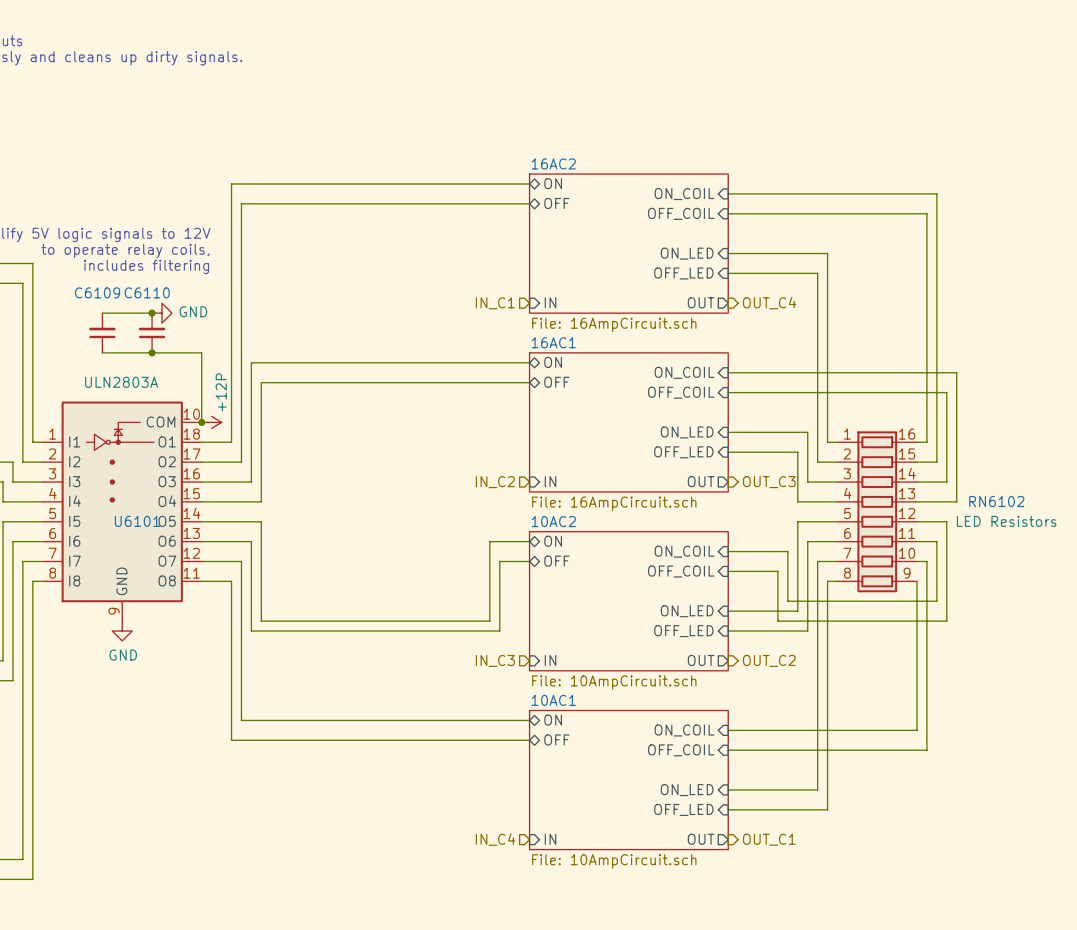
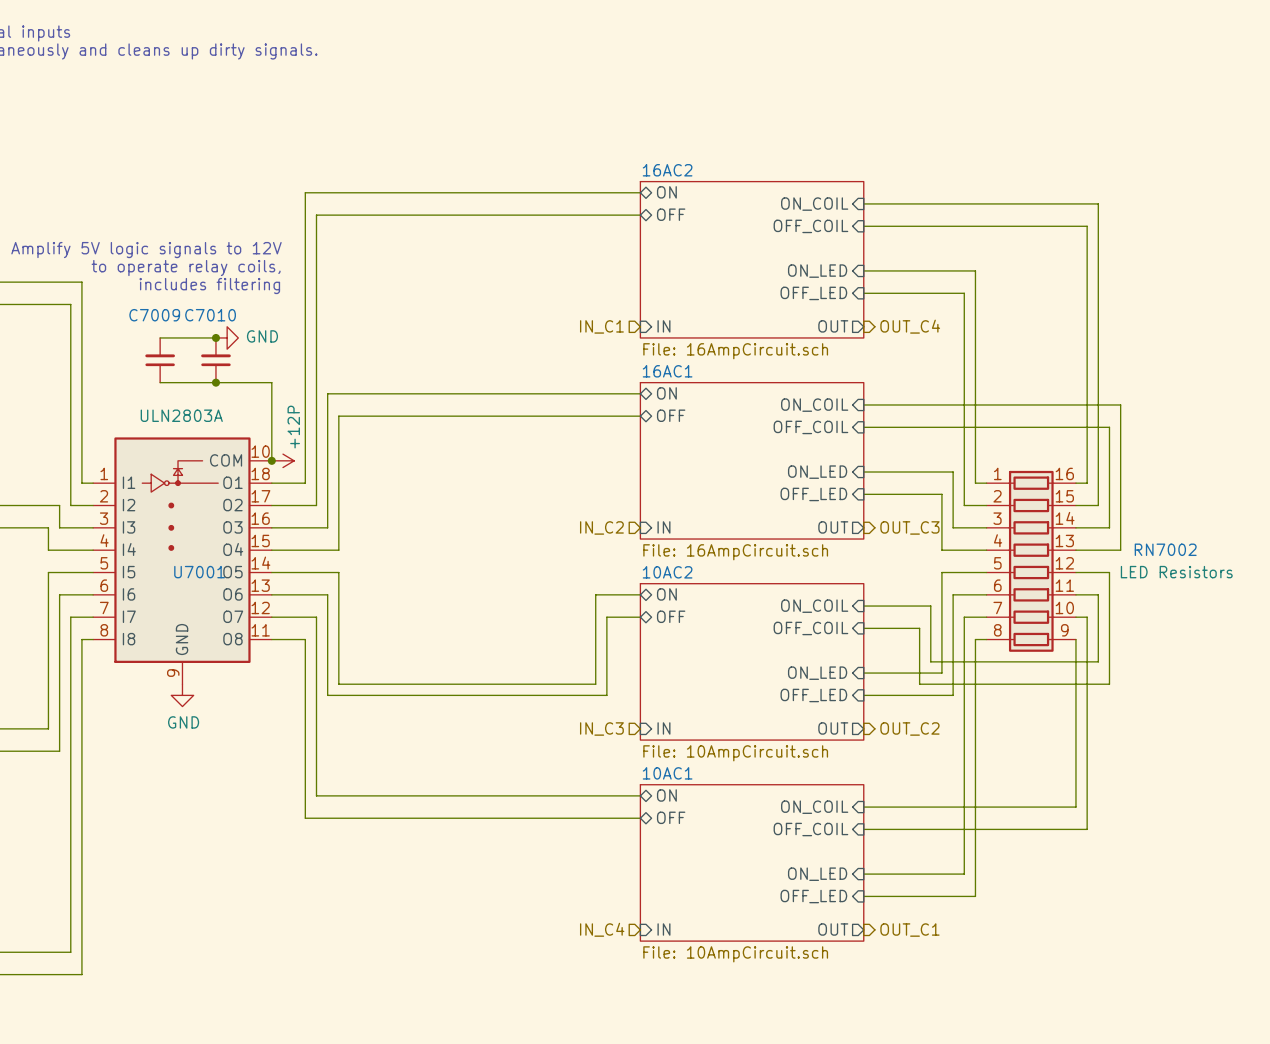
C6109 name: C6109 (97, 292) -> C7009 (154, 315)
C6110 name: C6110 (147, 292) -> C7010 (210, 315)
RN6102 name: RN6102 (996, 501) -> RN7002 (1165, 549)
U6101 name: U6101 (137, 521) -> U7001 (199, 572)

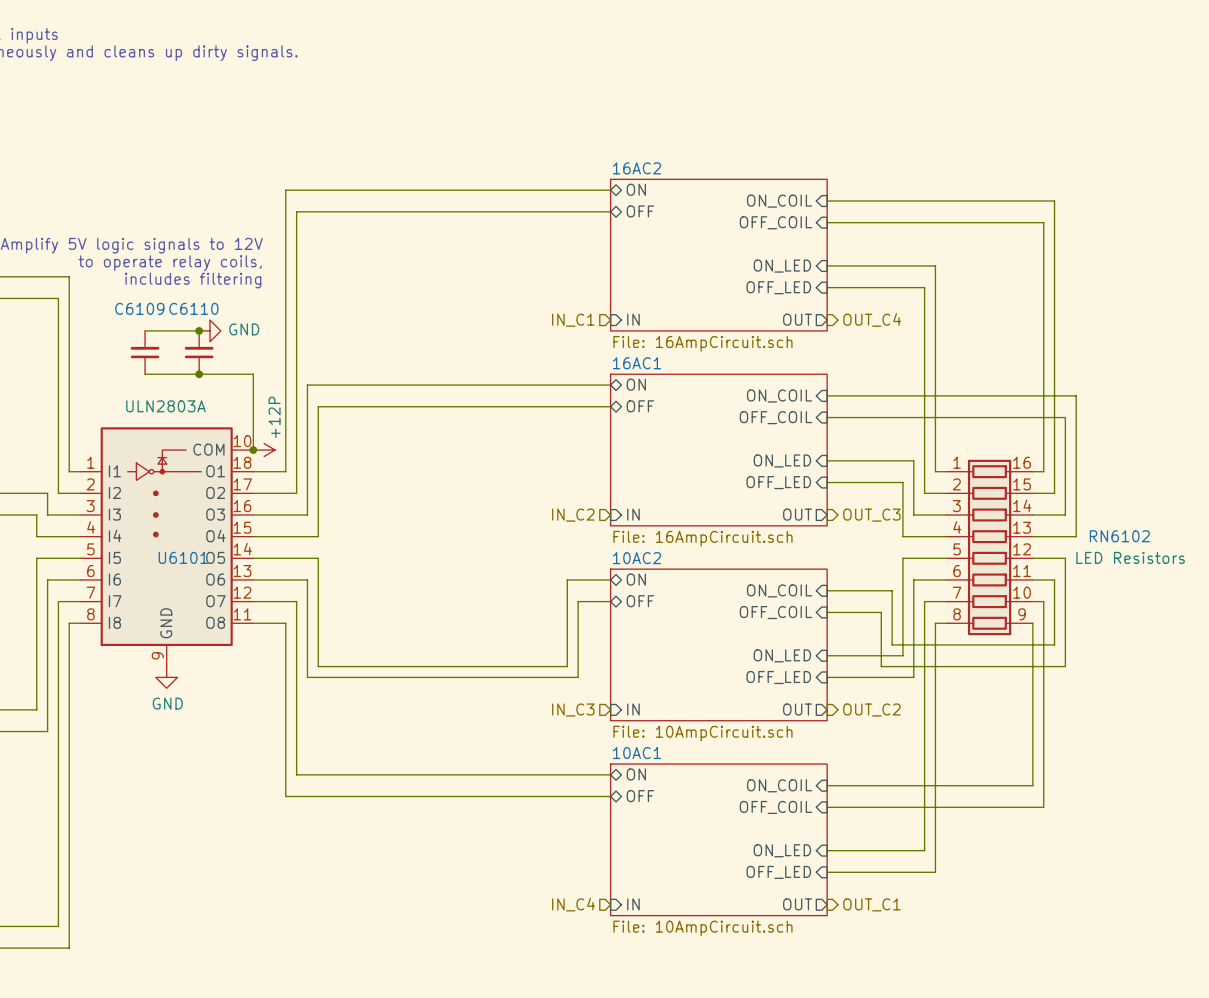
C7009 name: C7009 (154, 315) -> C6109 (139, 308)
C7010 name: C7010 (210, 315) -> C6110 (193, 308)
RN7002 name: RN7002 (1165, 549) -> RN6102 (1119, 536)
U7001 name: U7001 (199, 572) -> U6101 (183, 557)

